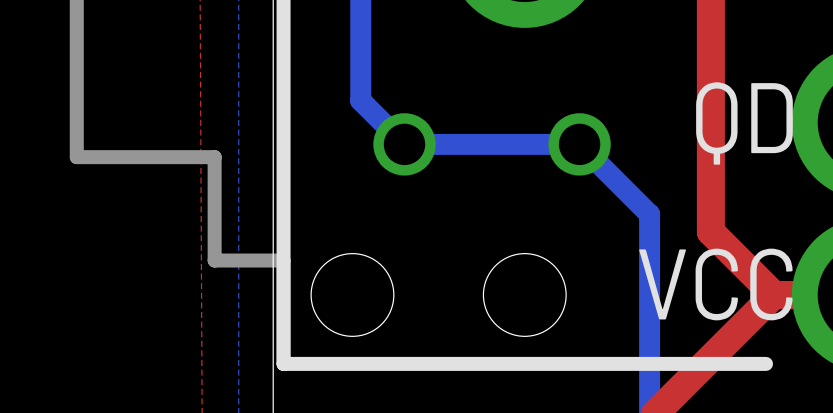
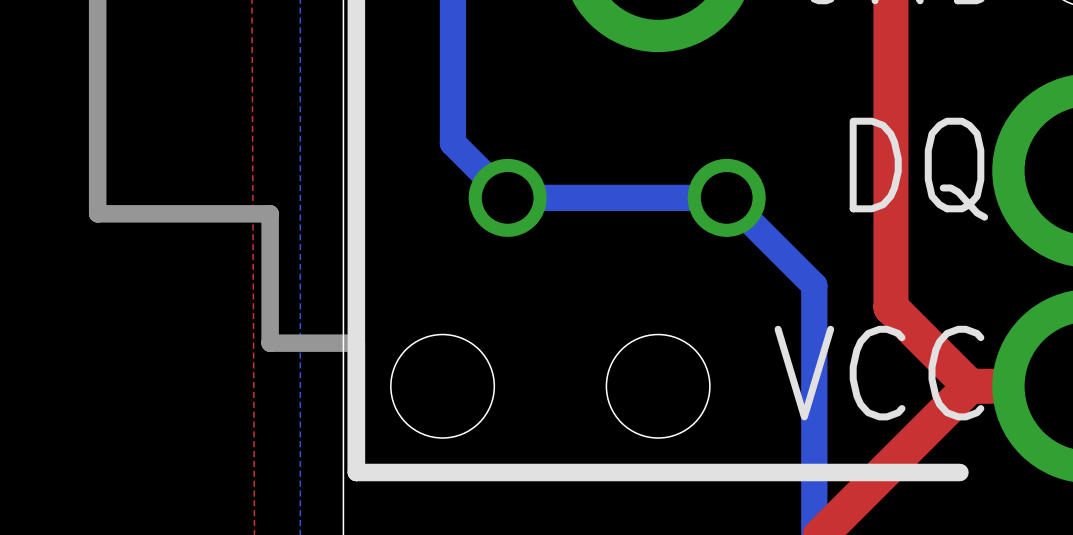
text: QD (744, 123) -> DQ (918, 169)

